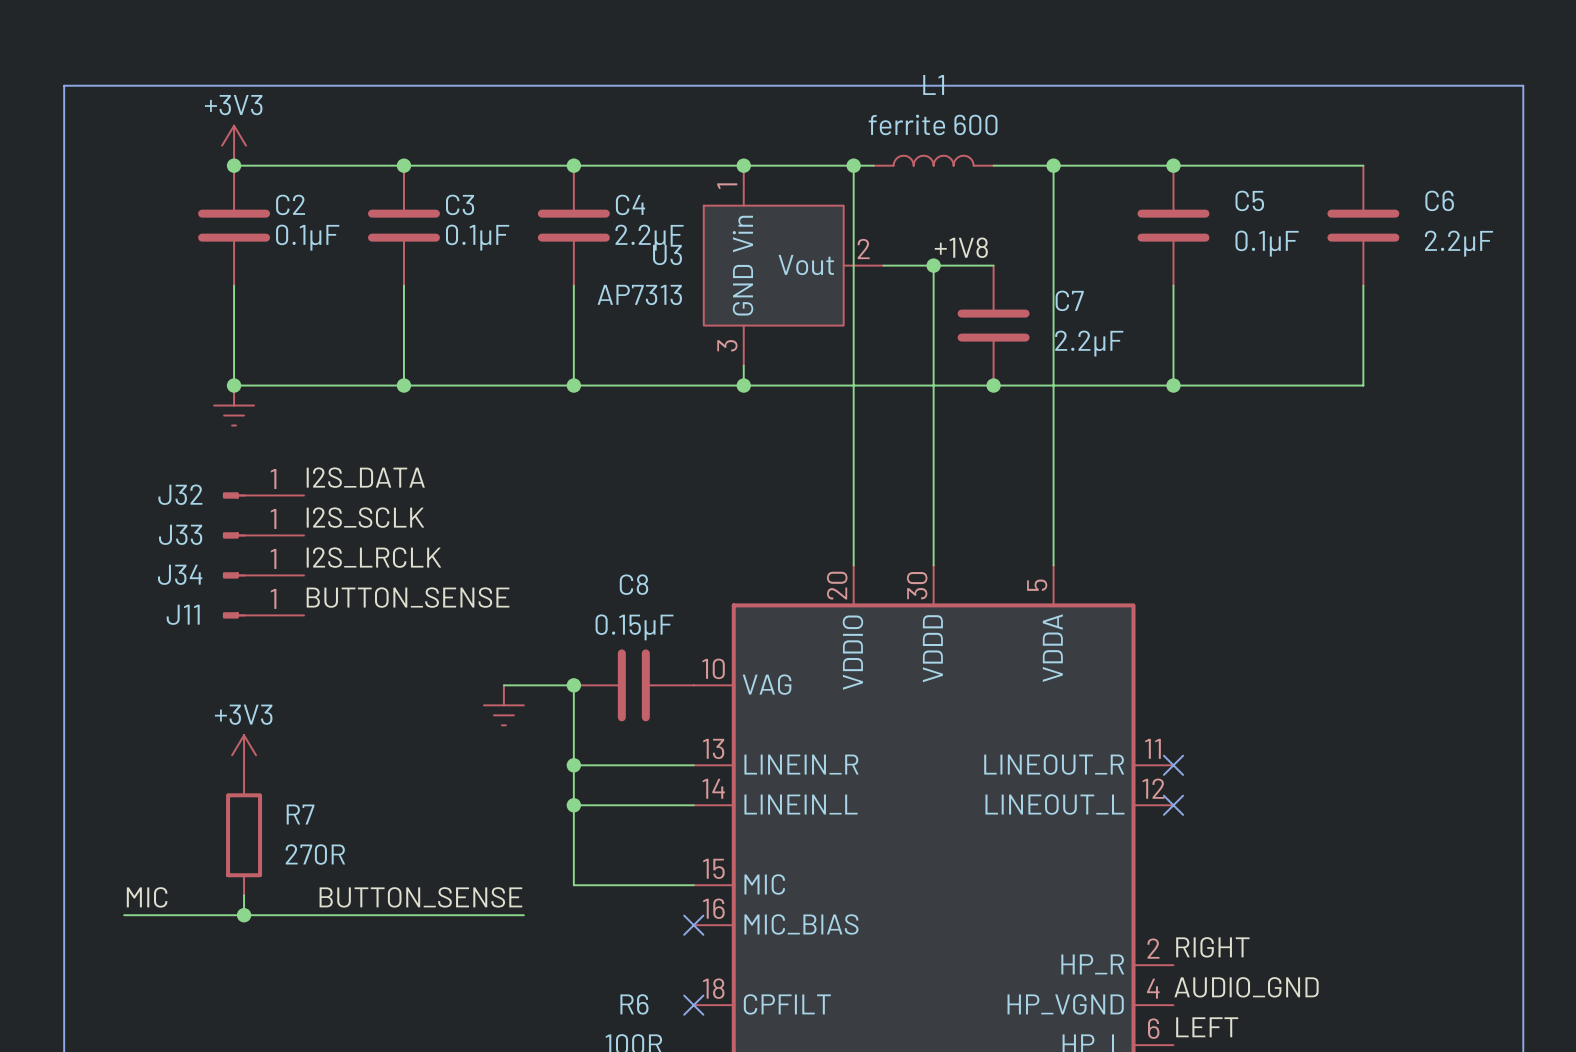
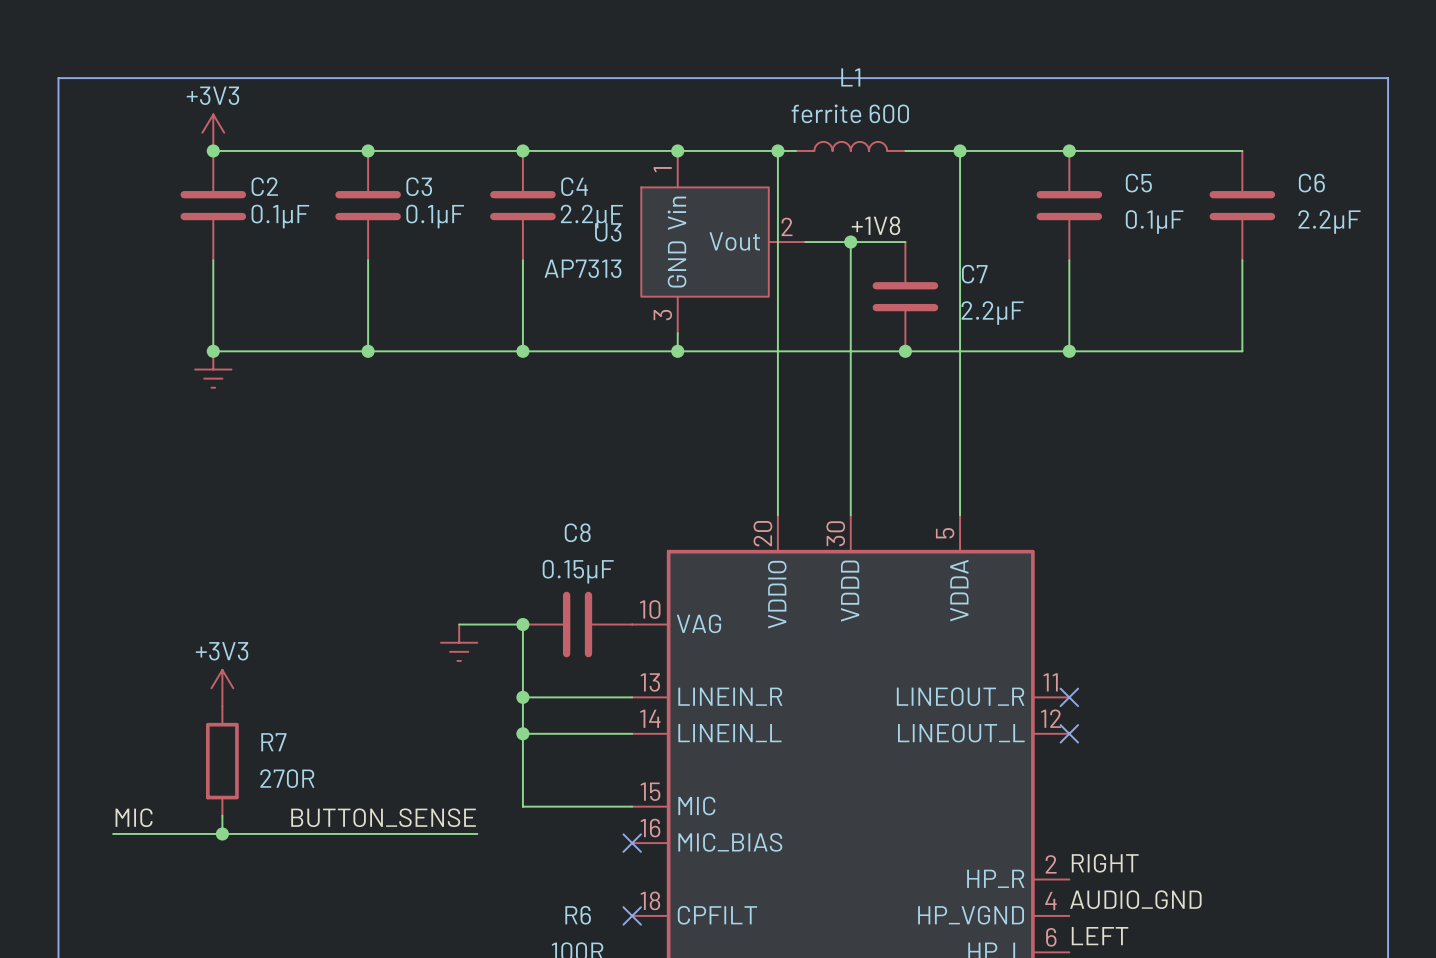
label: I2S_DATA (365, 477) -> none
J32: (263, 495) -> none
label: I2S_SCLK (365, 517) -> none
J33: (263, 535) -> none
label: I2S_LRCLK (373, 557) -> none
J34: (263, 575) -> none
label: BUTTON_SENSE (408, 597) -> none
J11: (263, 615) -> none

